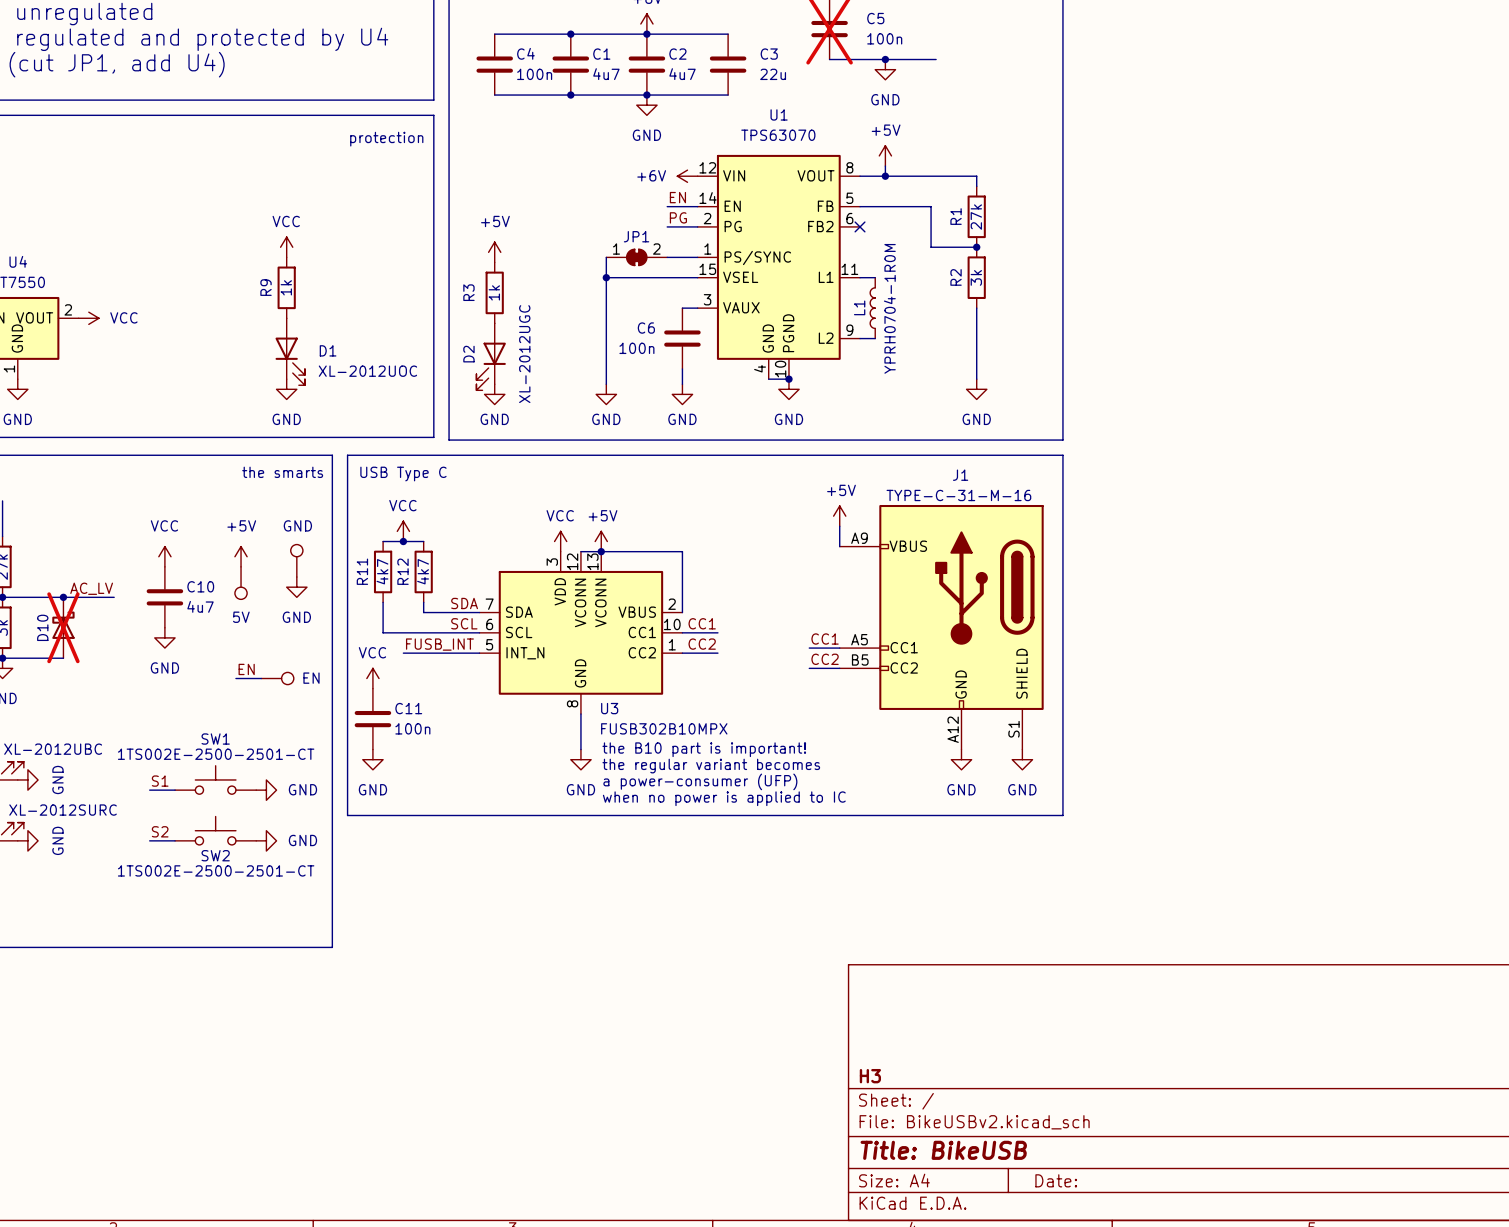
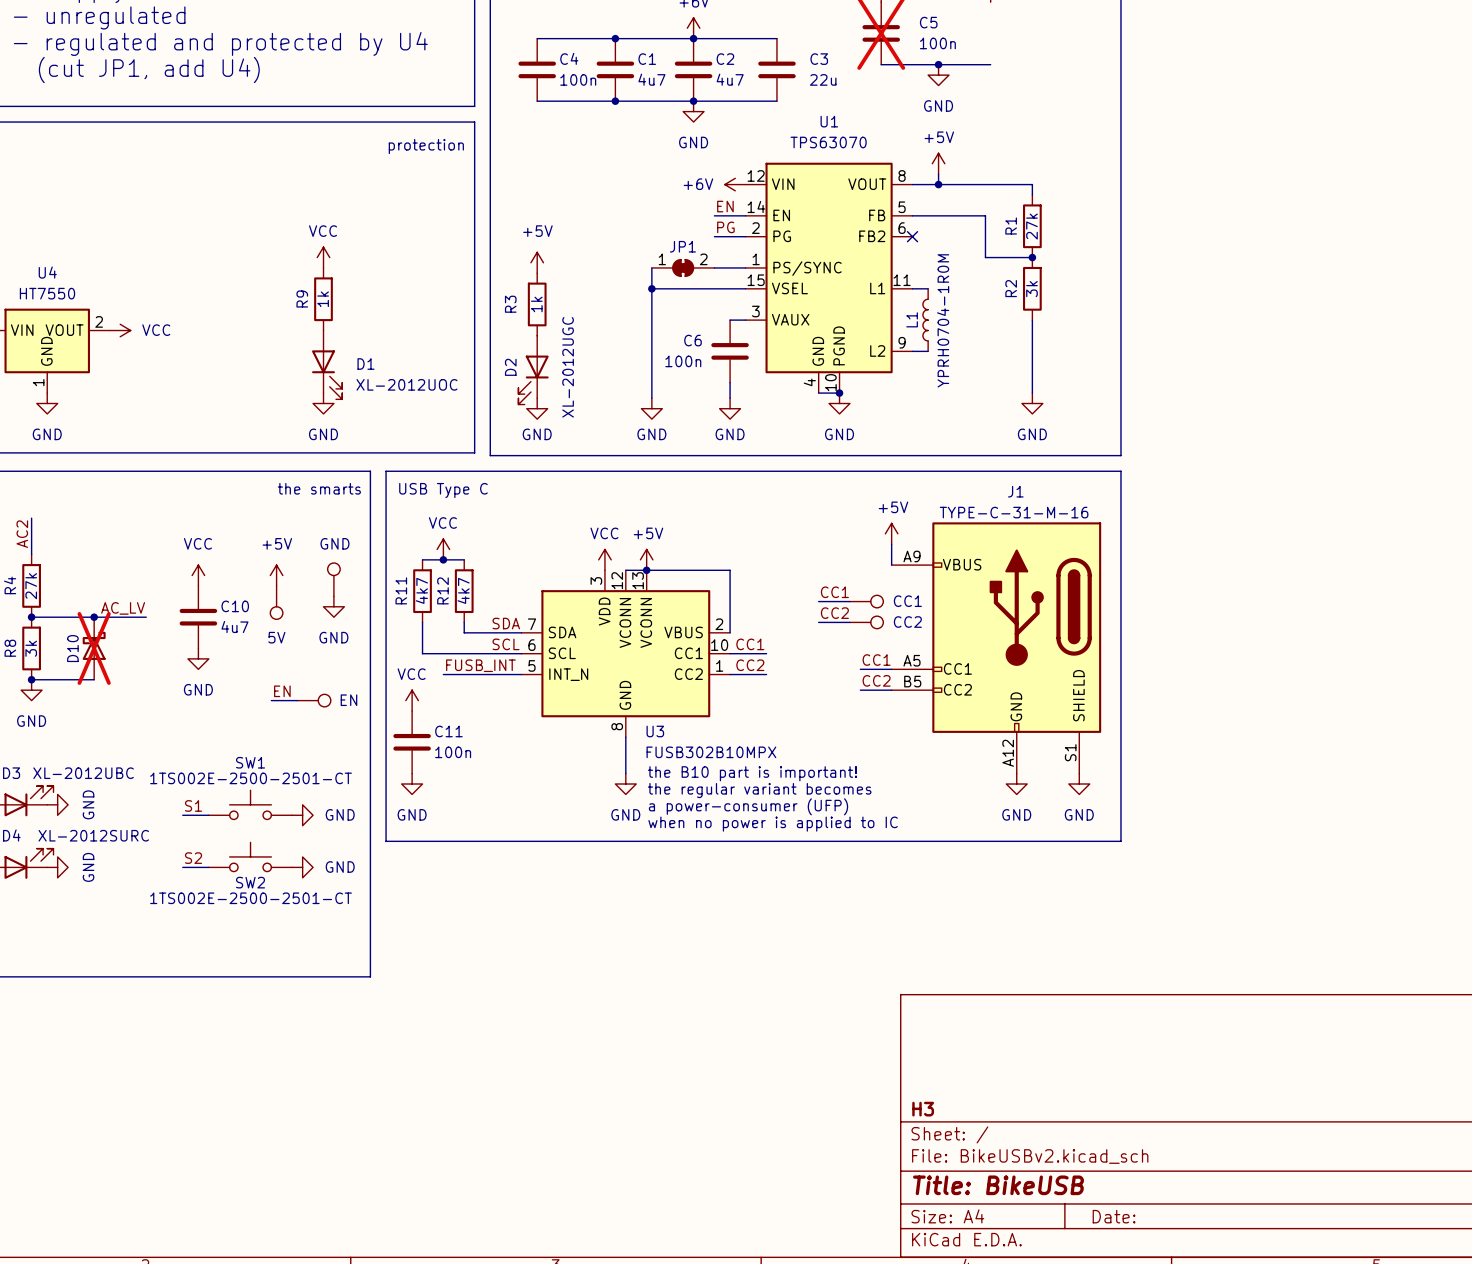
label: none -> CC1 (834, 592)
wire: none -> (818, 601) (849, 601)
part: none -> CC1 (866, 601)
label: none -> CC2 (834, 613)
wire: none -> (818, 622) (849, 622)
part: none -> CC2 (866, 622)

